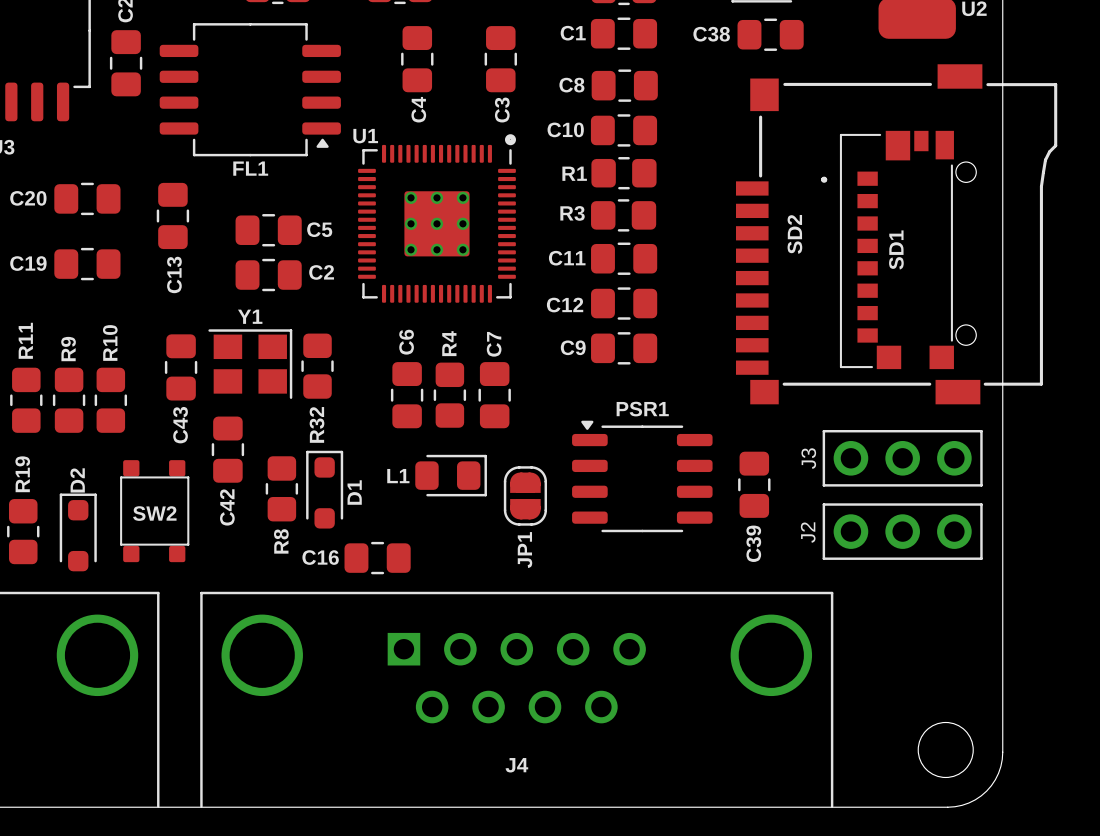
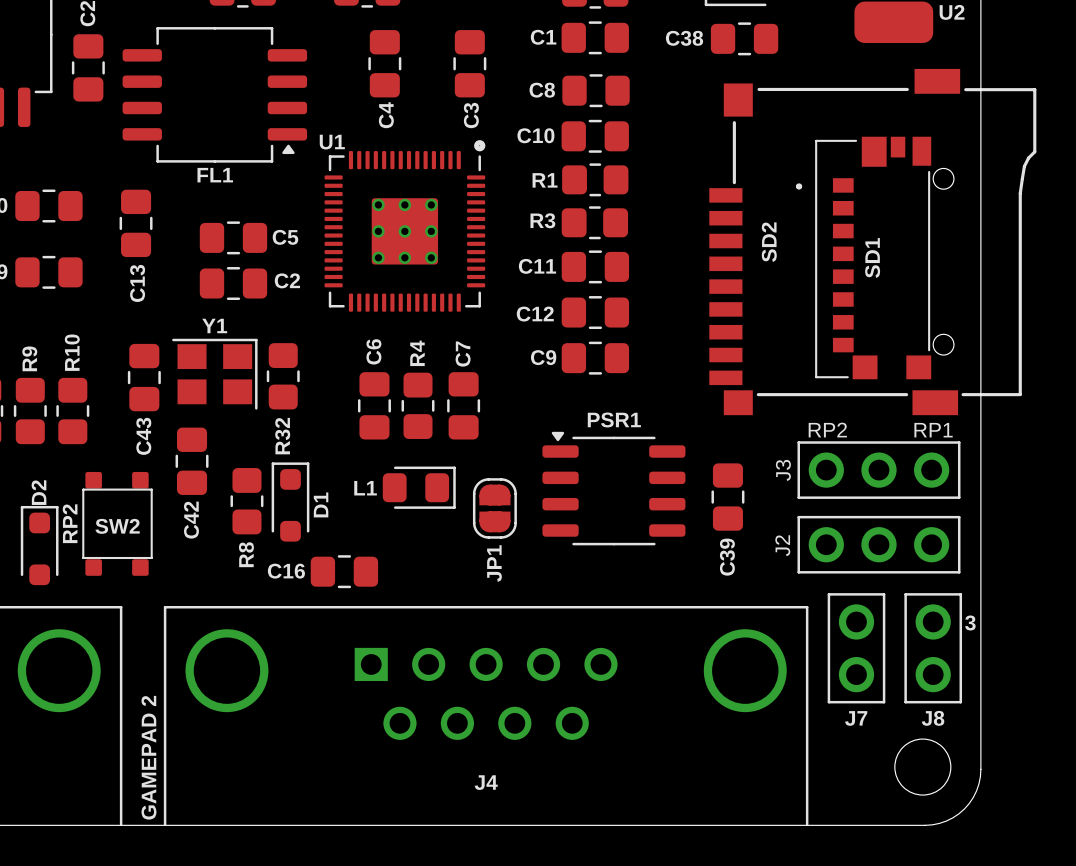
text: none -> RP2 (827, 430)
text: none -> RP1 (933, 430)
text: none -> RP2 (70, 523)
text: none -> 3 (970, 622)
J7: none -> (856, 648)
J8: none -> (933, 648)
text: none -> GAMEPAD 2 (148, 757)

